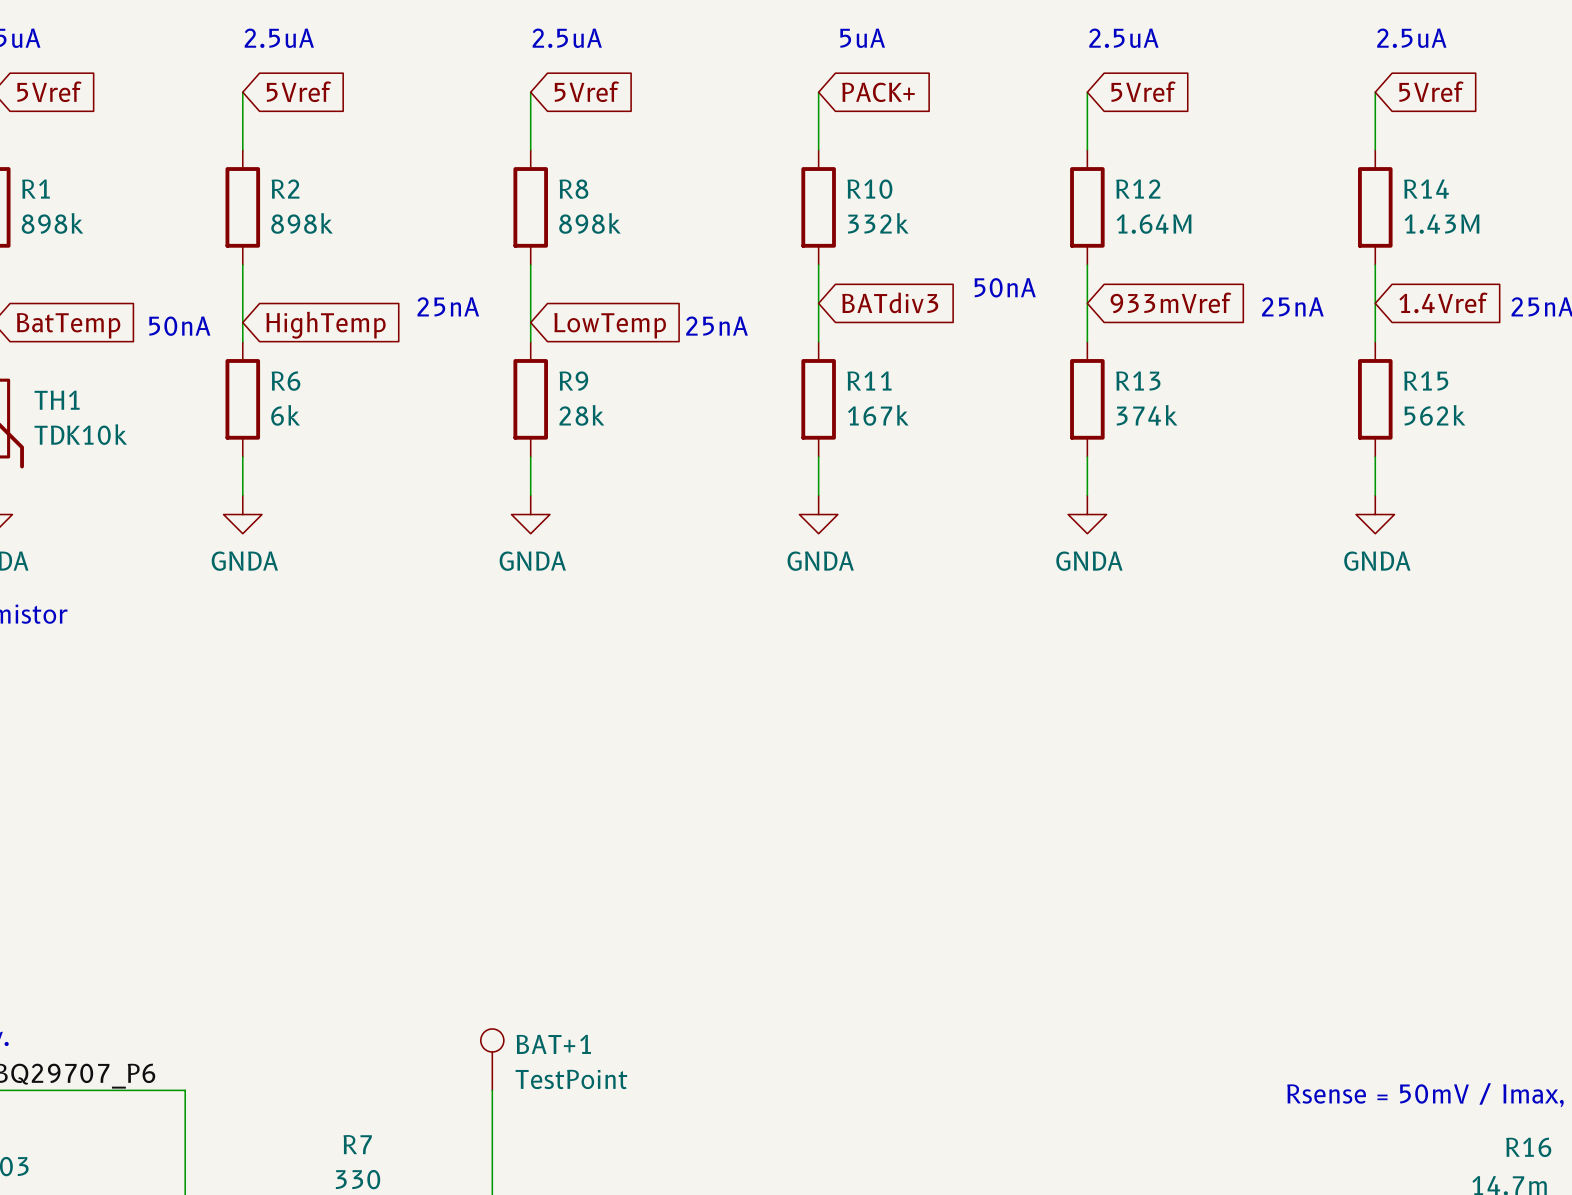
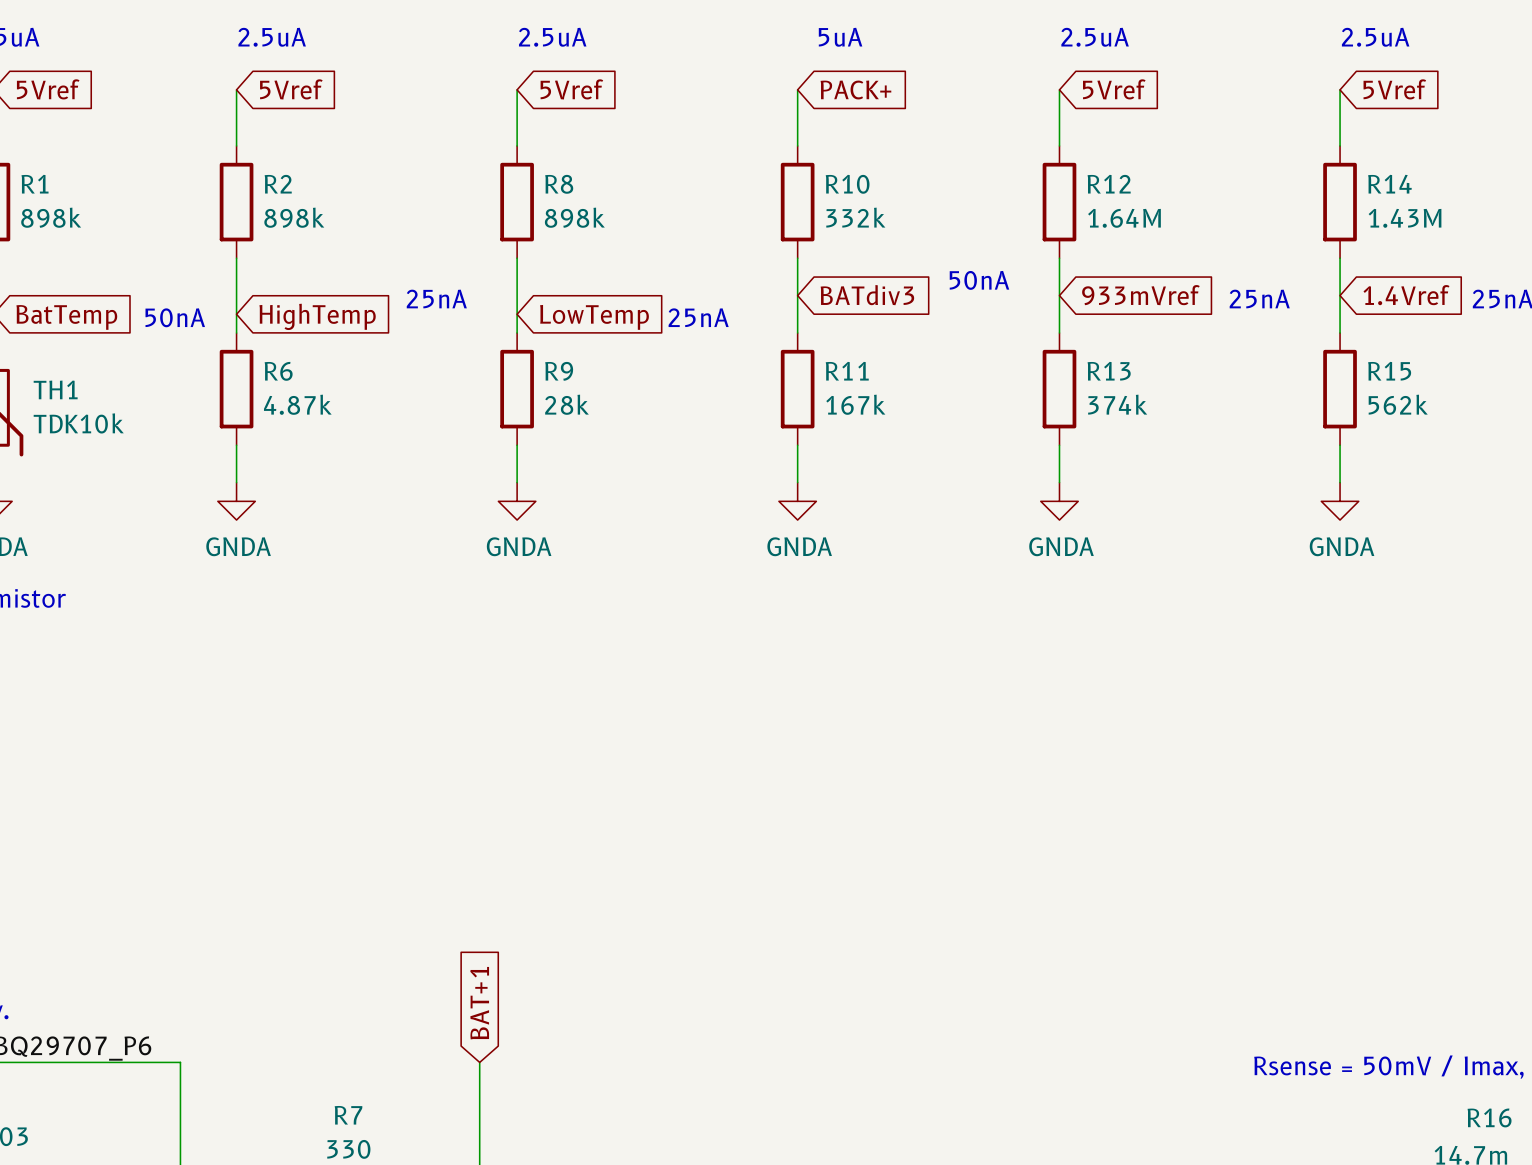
R6 value: 6k (285, 415) -> 4.87k (297, 404)
global label: none -> BAT+1 (479, 1003)
BAT+1: TestPoint (492, 1059) -> none

